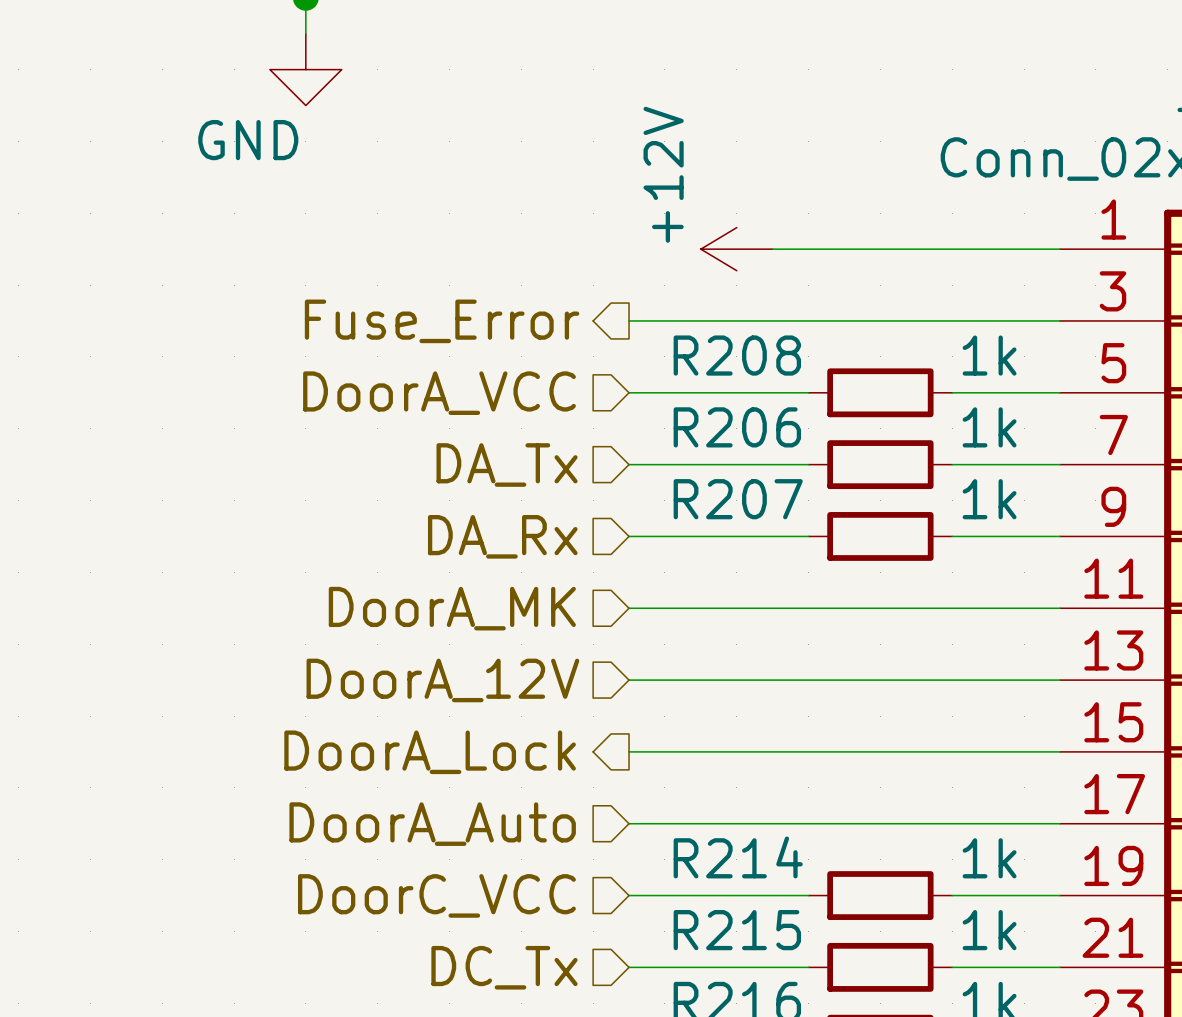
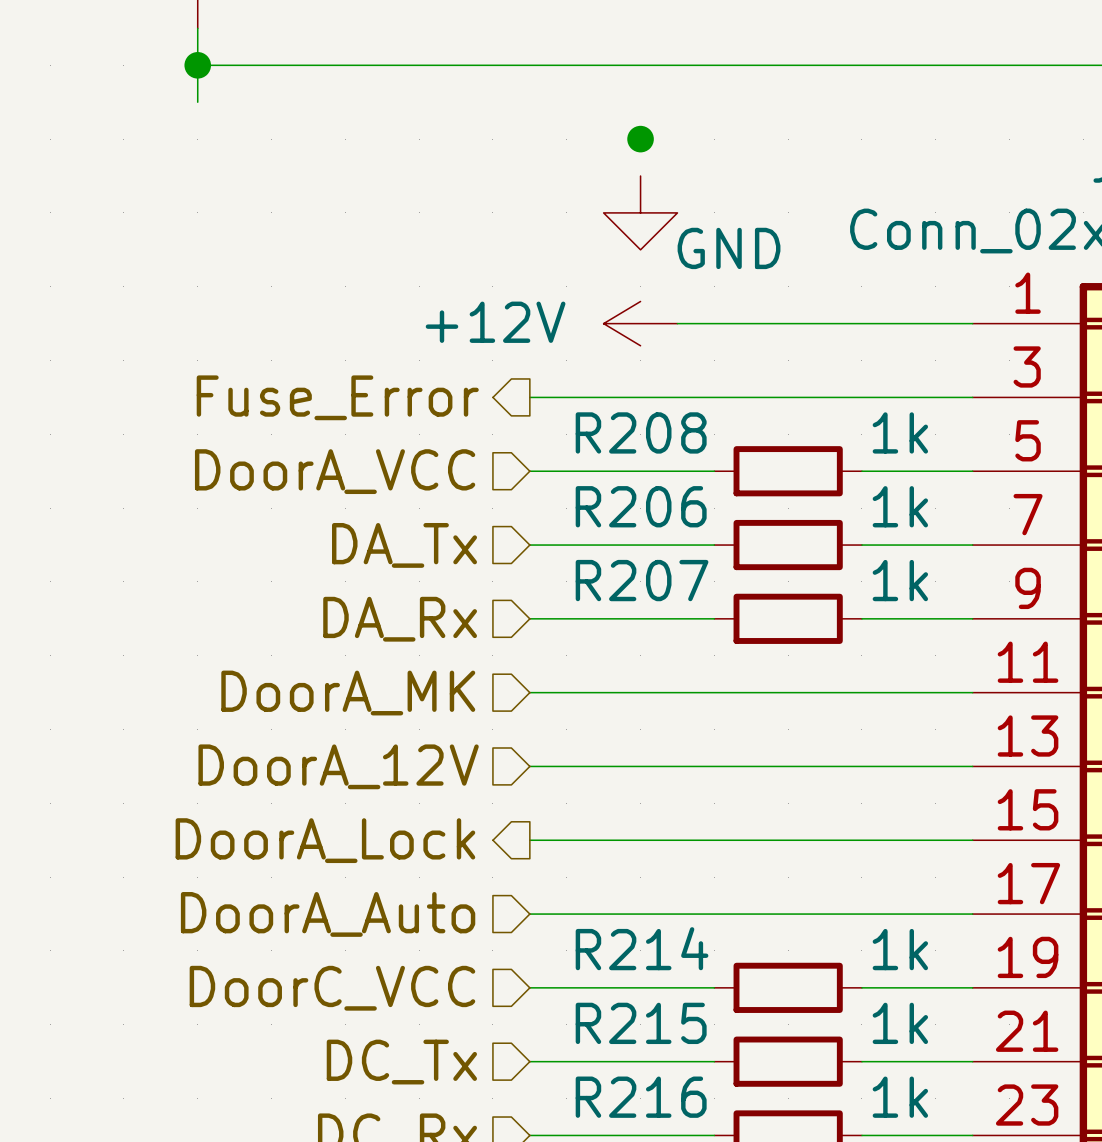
power symbol position: GND (305, 69) -> GND (640, 212)
junction: none -> (640, 139)
power symbol text position: GND (248, 140) -> GND (729, 248)
power symbol text rotation: 0° (663, 174) -> 90° clockwise (495, 322)

